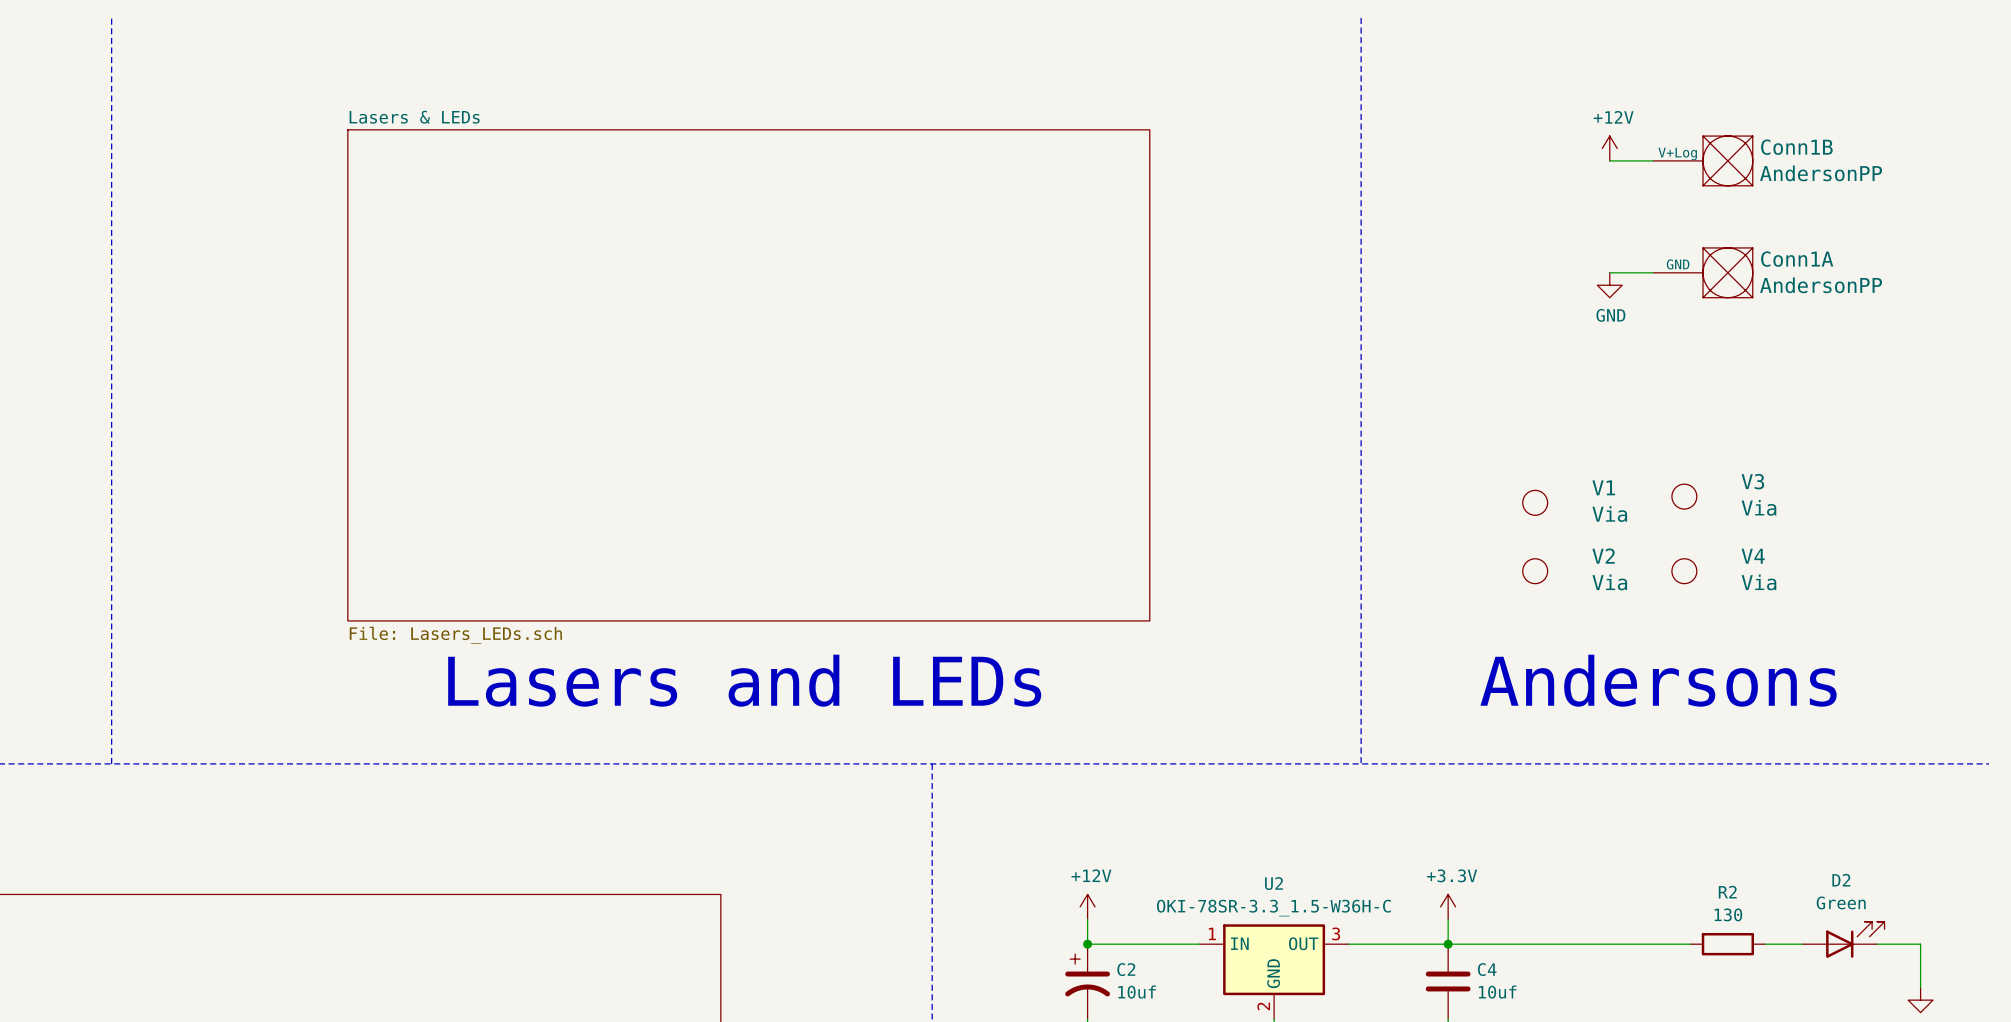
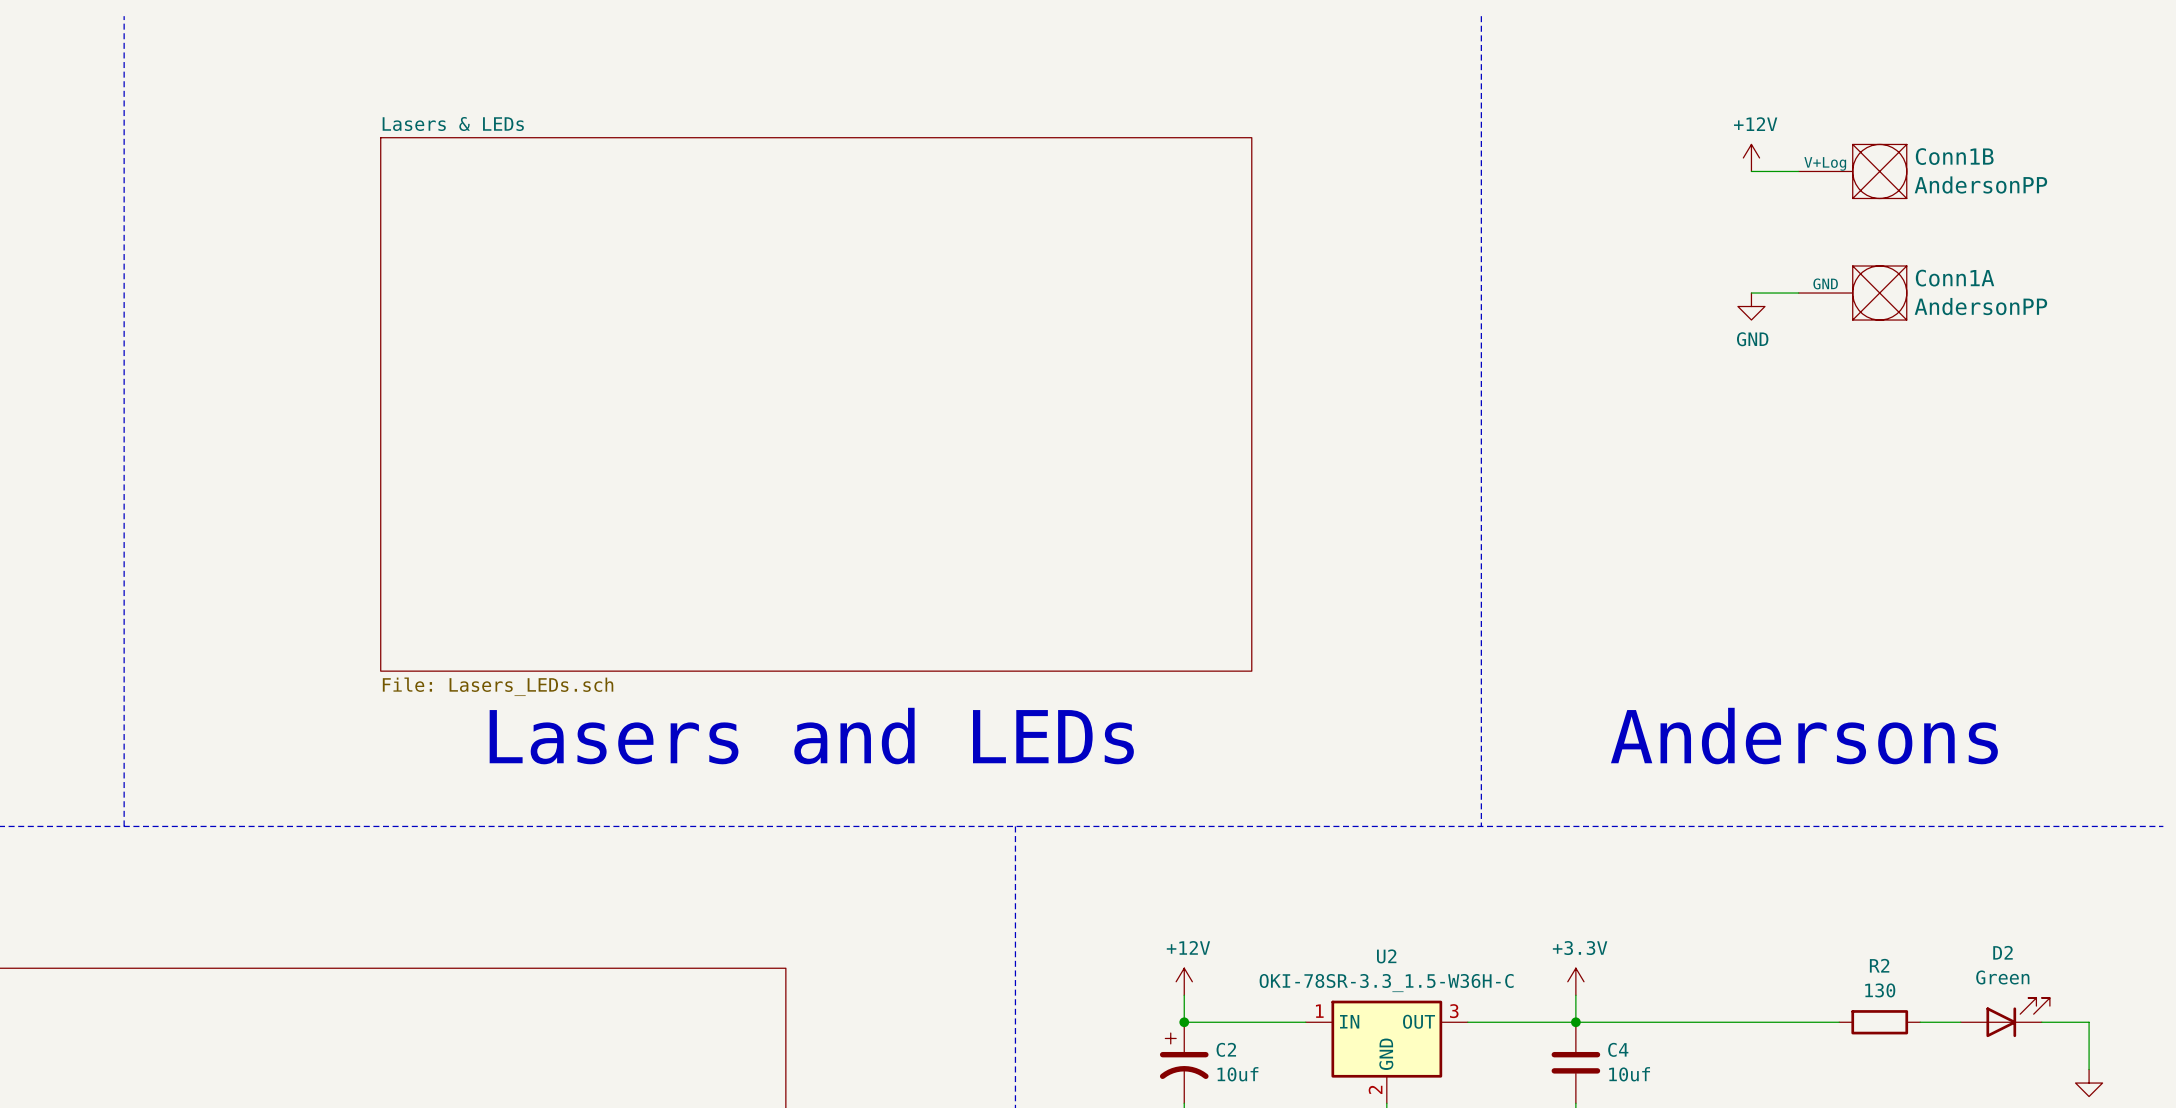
V3: Via (1684, 496) -> none
V1: Via (1535, 502) -> none
V2: Via (1535, 571) -> none
V4: Via (1684, 571) -> none

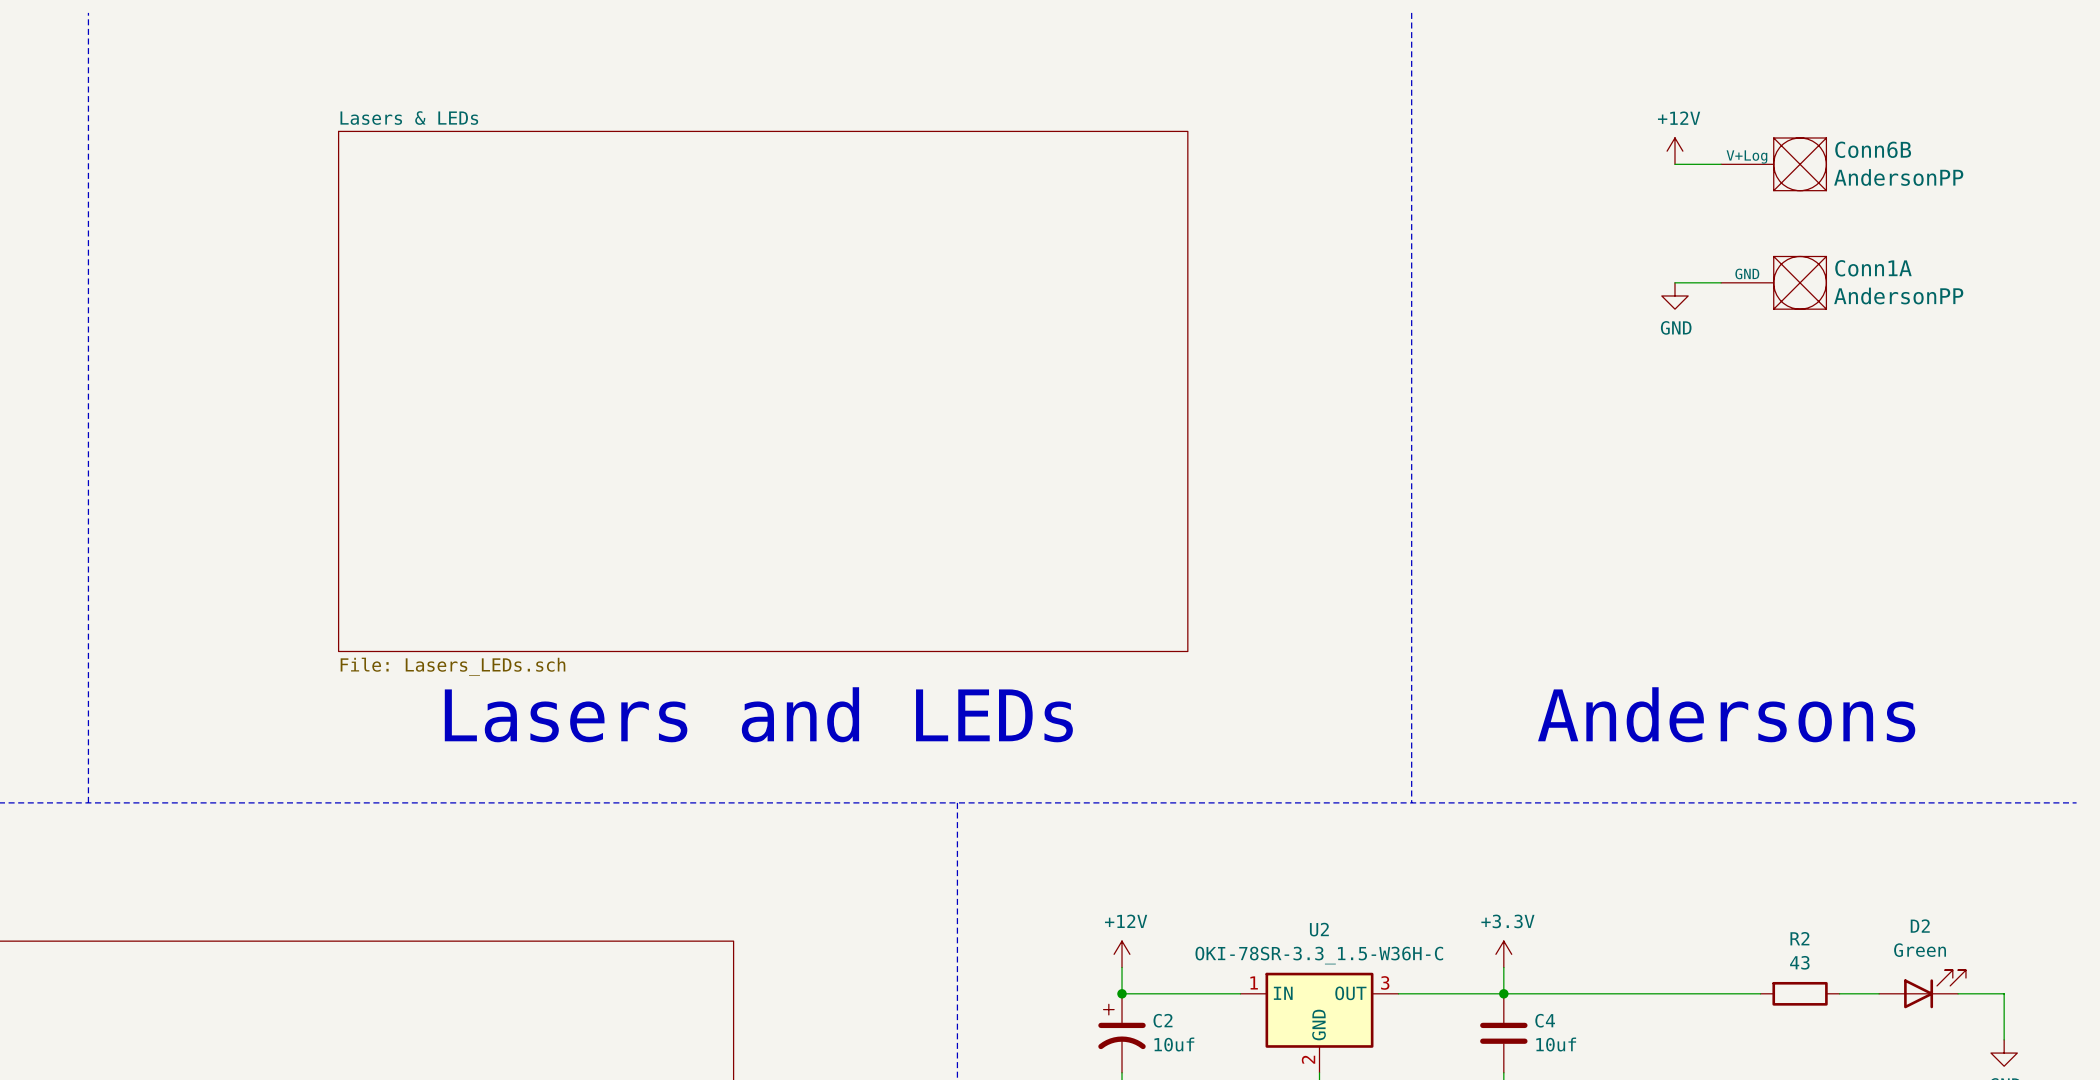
Conn1B name: Conn1B (1954, 156) -> Conn6B (1873, 149)
R2 value: 130 (1880, 990) -> 43 (1799, 962)

